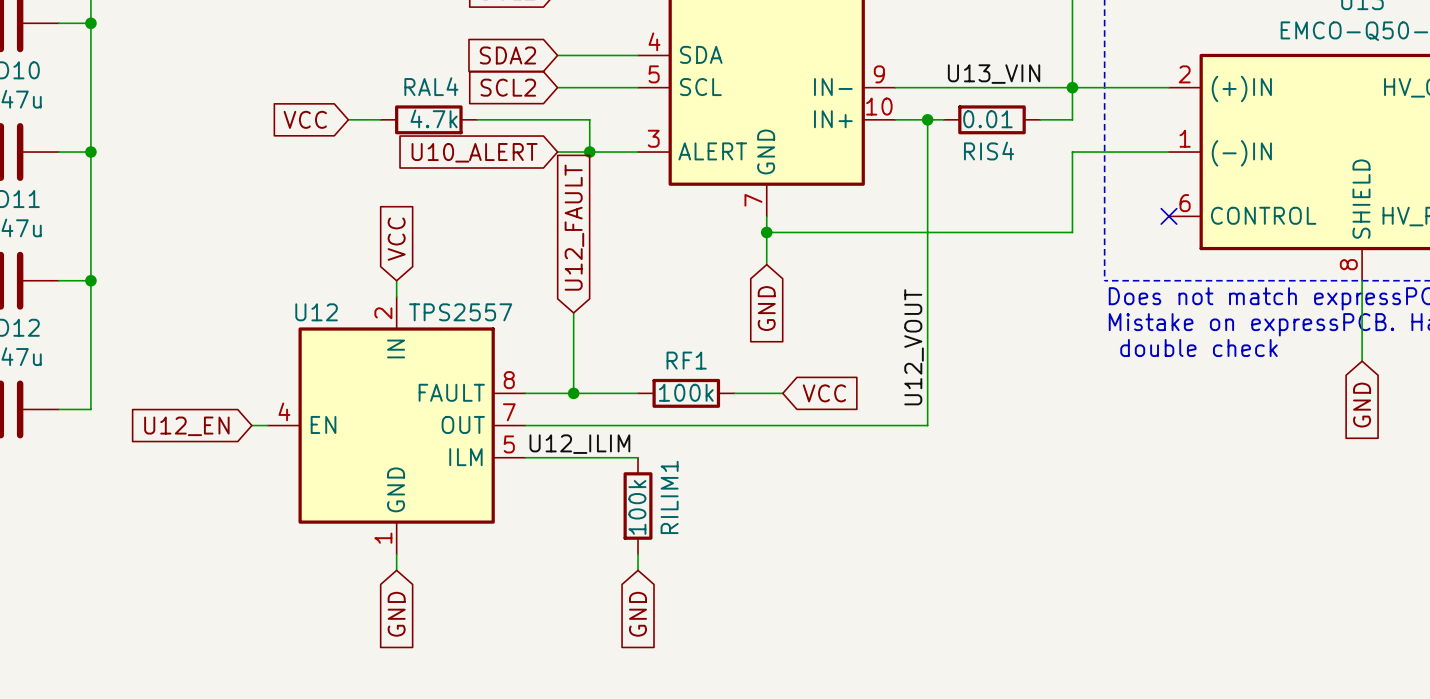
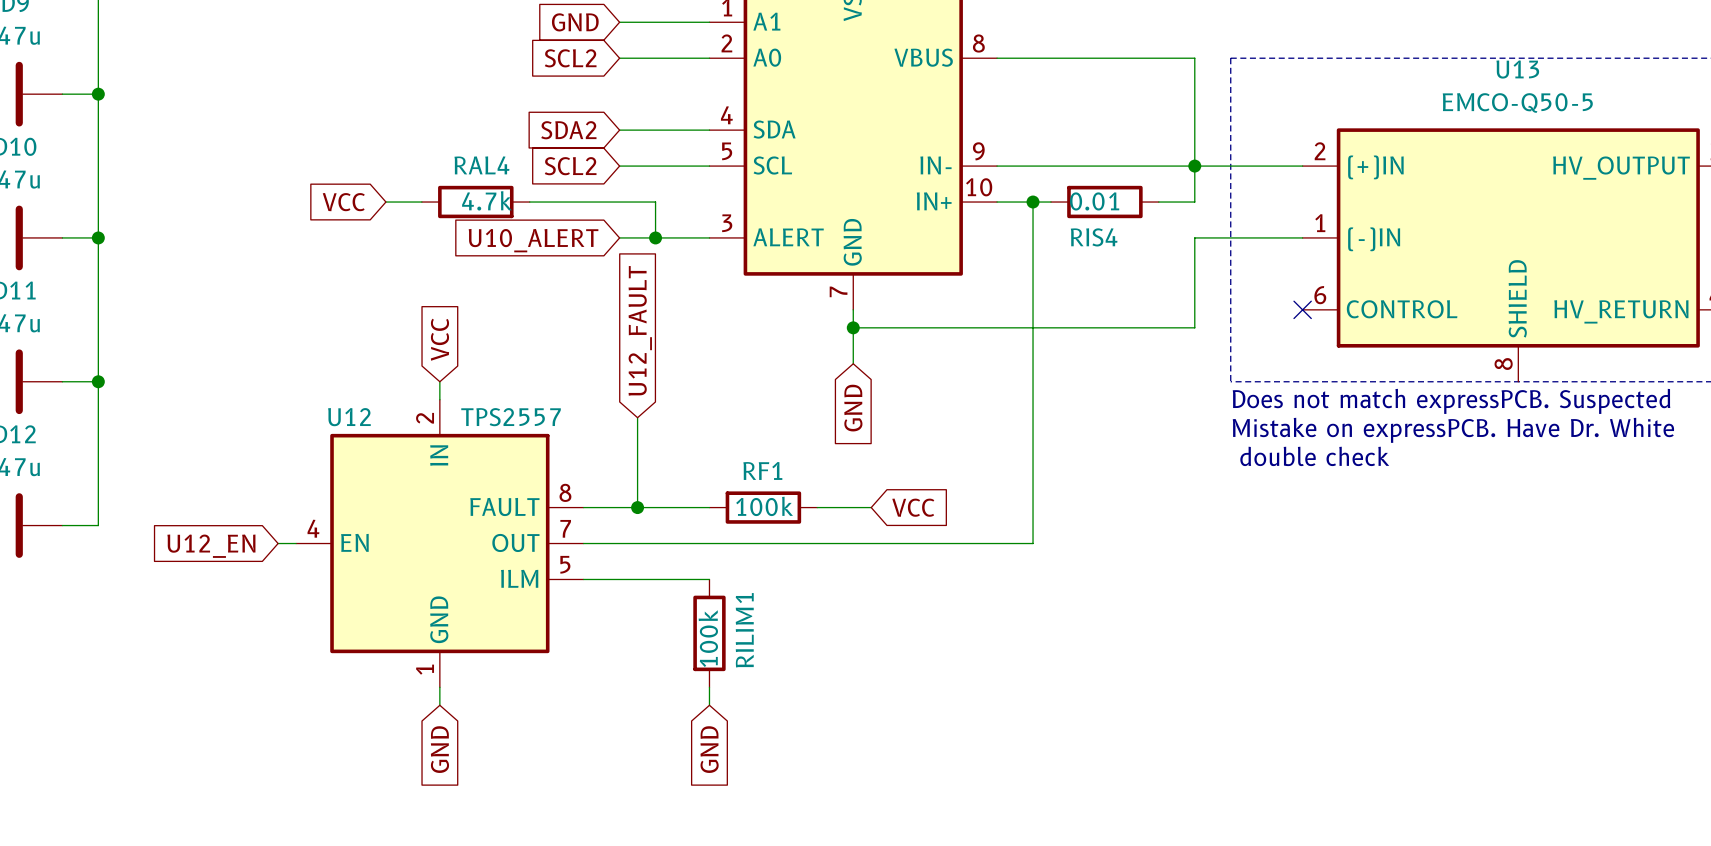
label: U13_VIN (994, 74) -> none
wire: (1362, 280) (1362, 361) -> none
label: U12_VOUT (914, 347) -> none
global label: GND (1362, 405) -> none
label: U12_ILIM (579, 444) -> none

